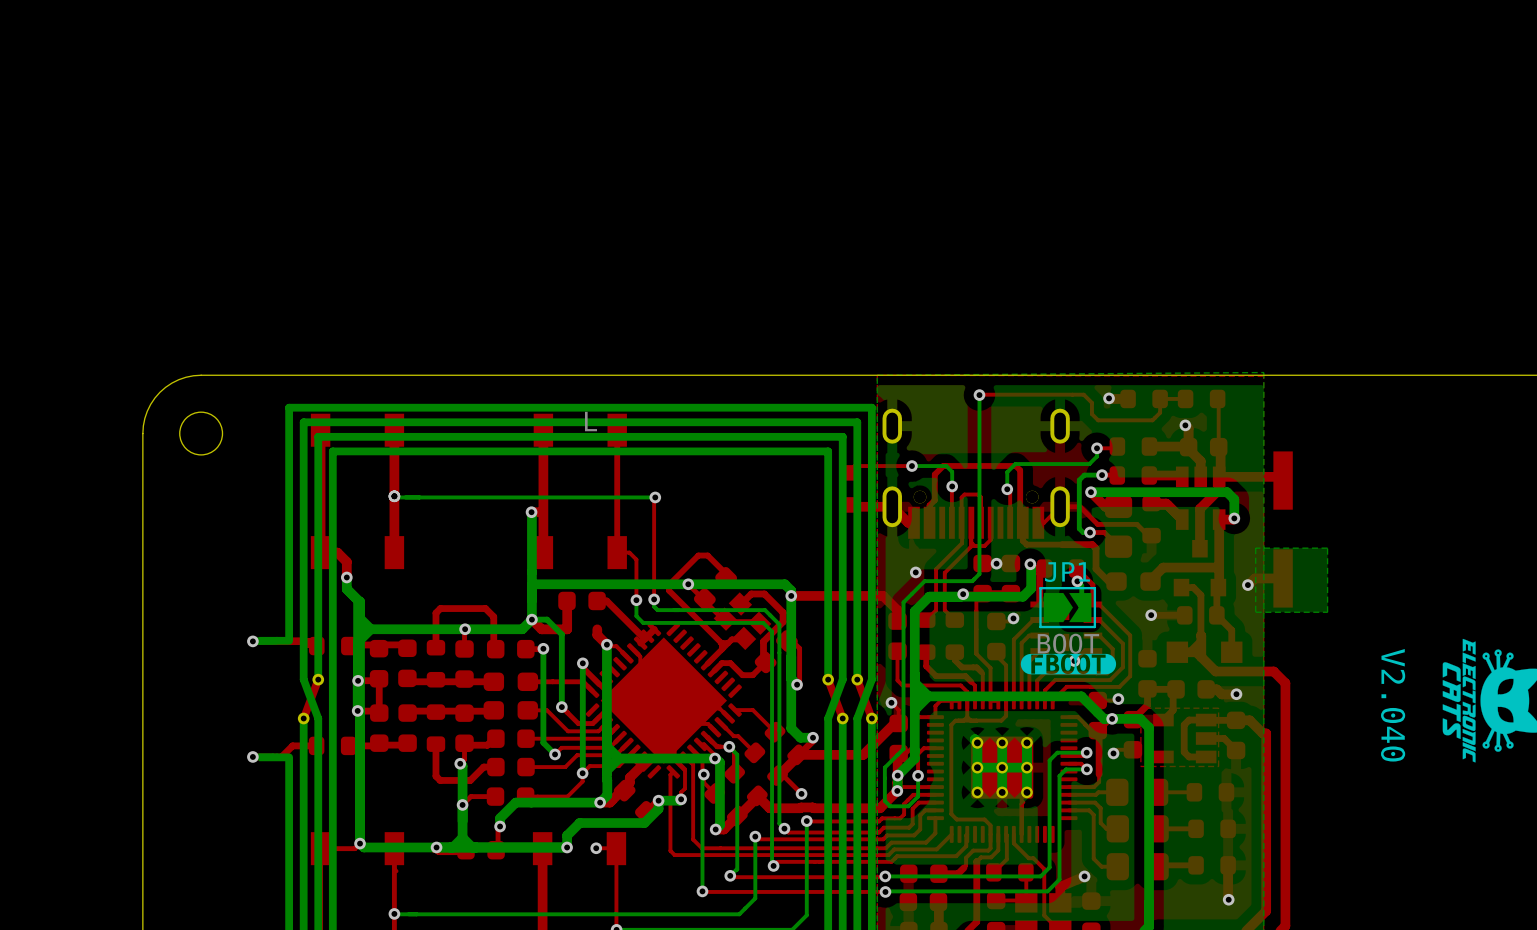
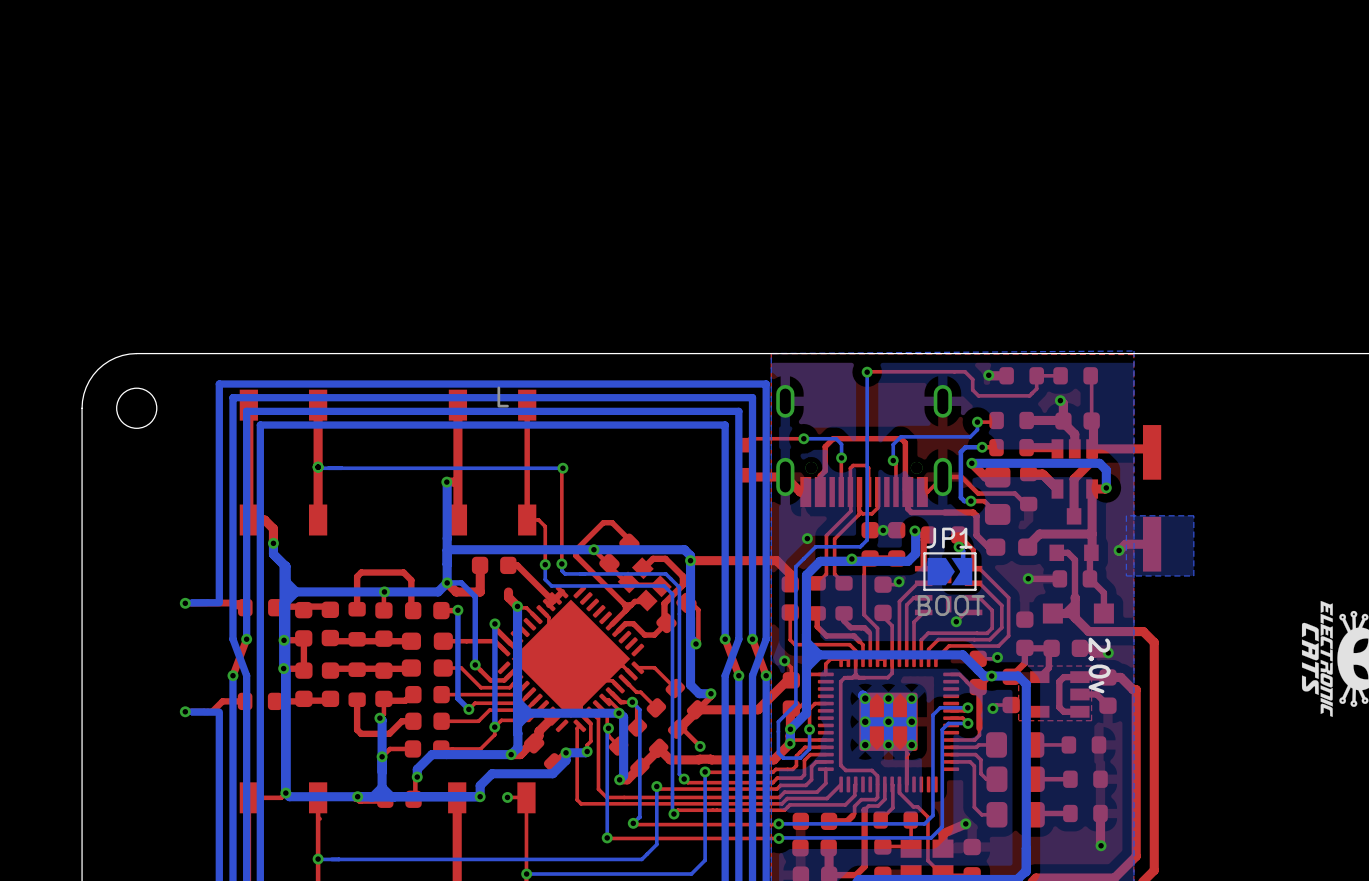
drawing: [1020, 653, 1117, 675] -> none
text: V2.040 (1393, 705) -> none
text: none -> 2.0v (1099, 665)

